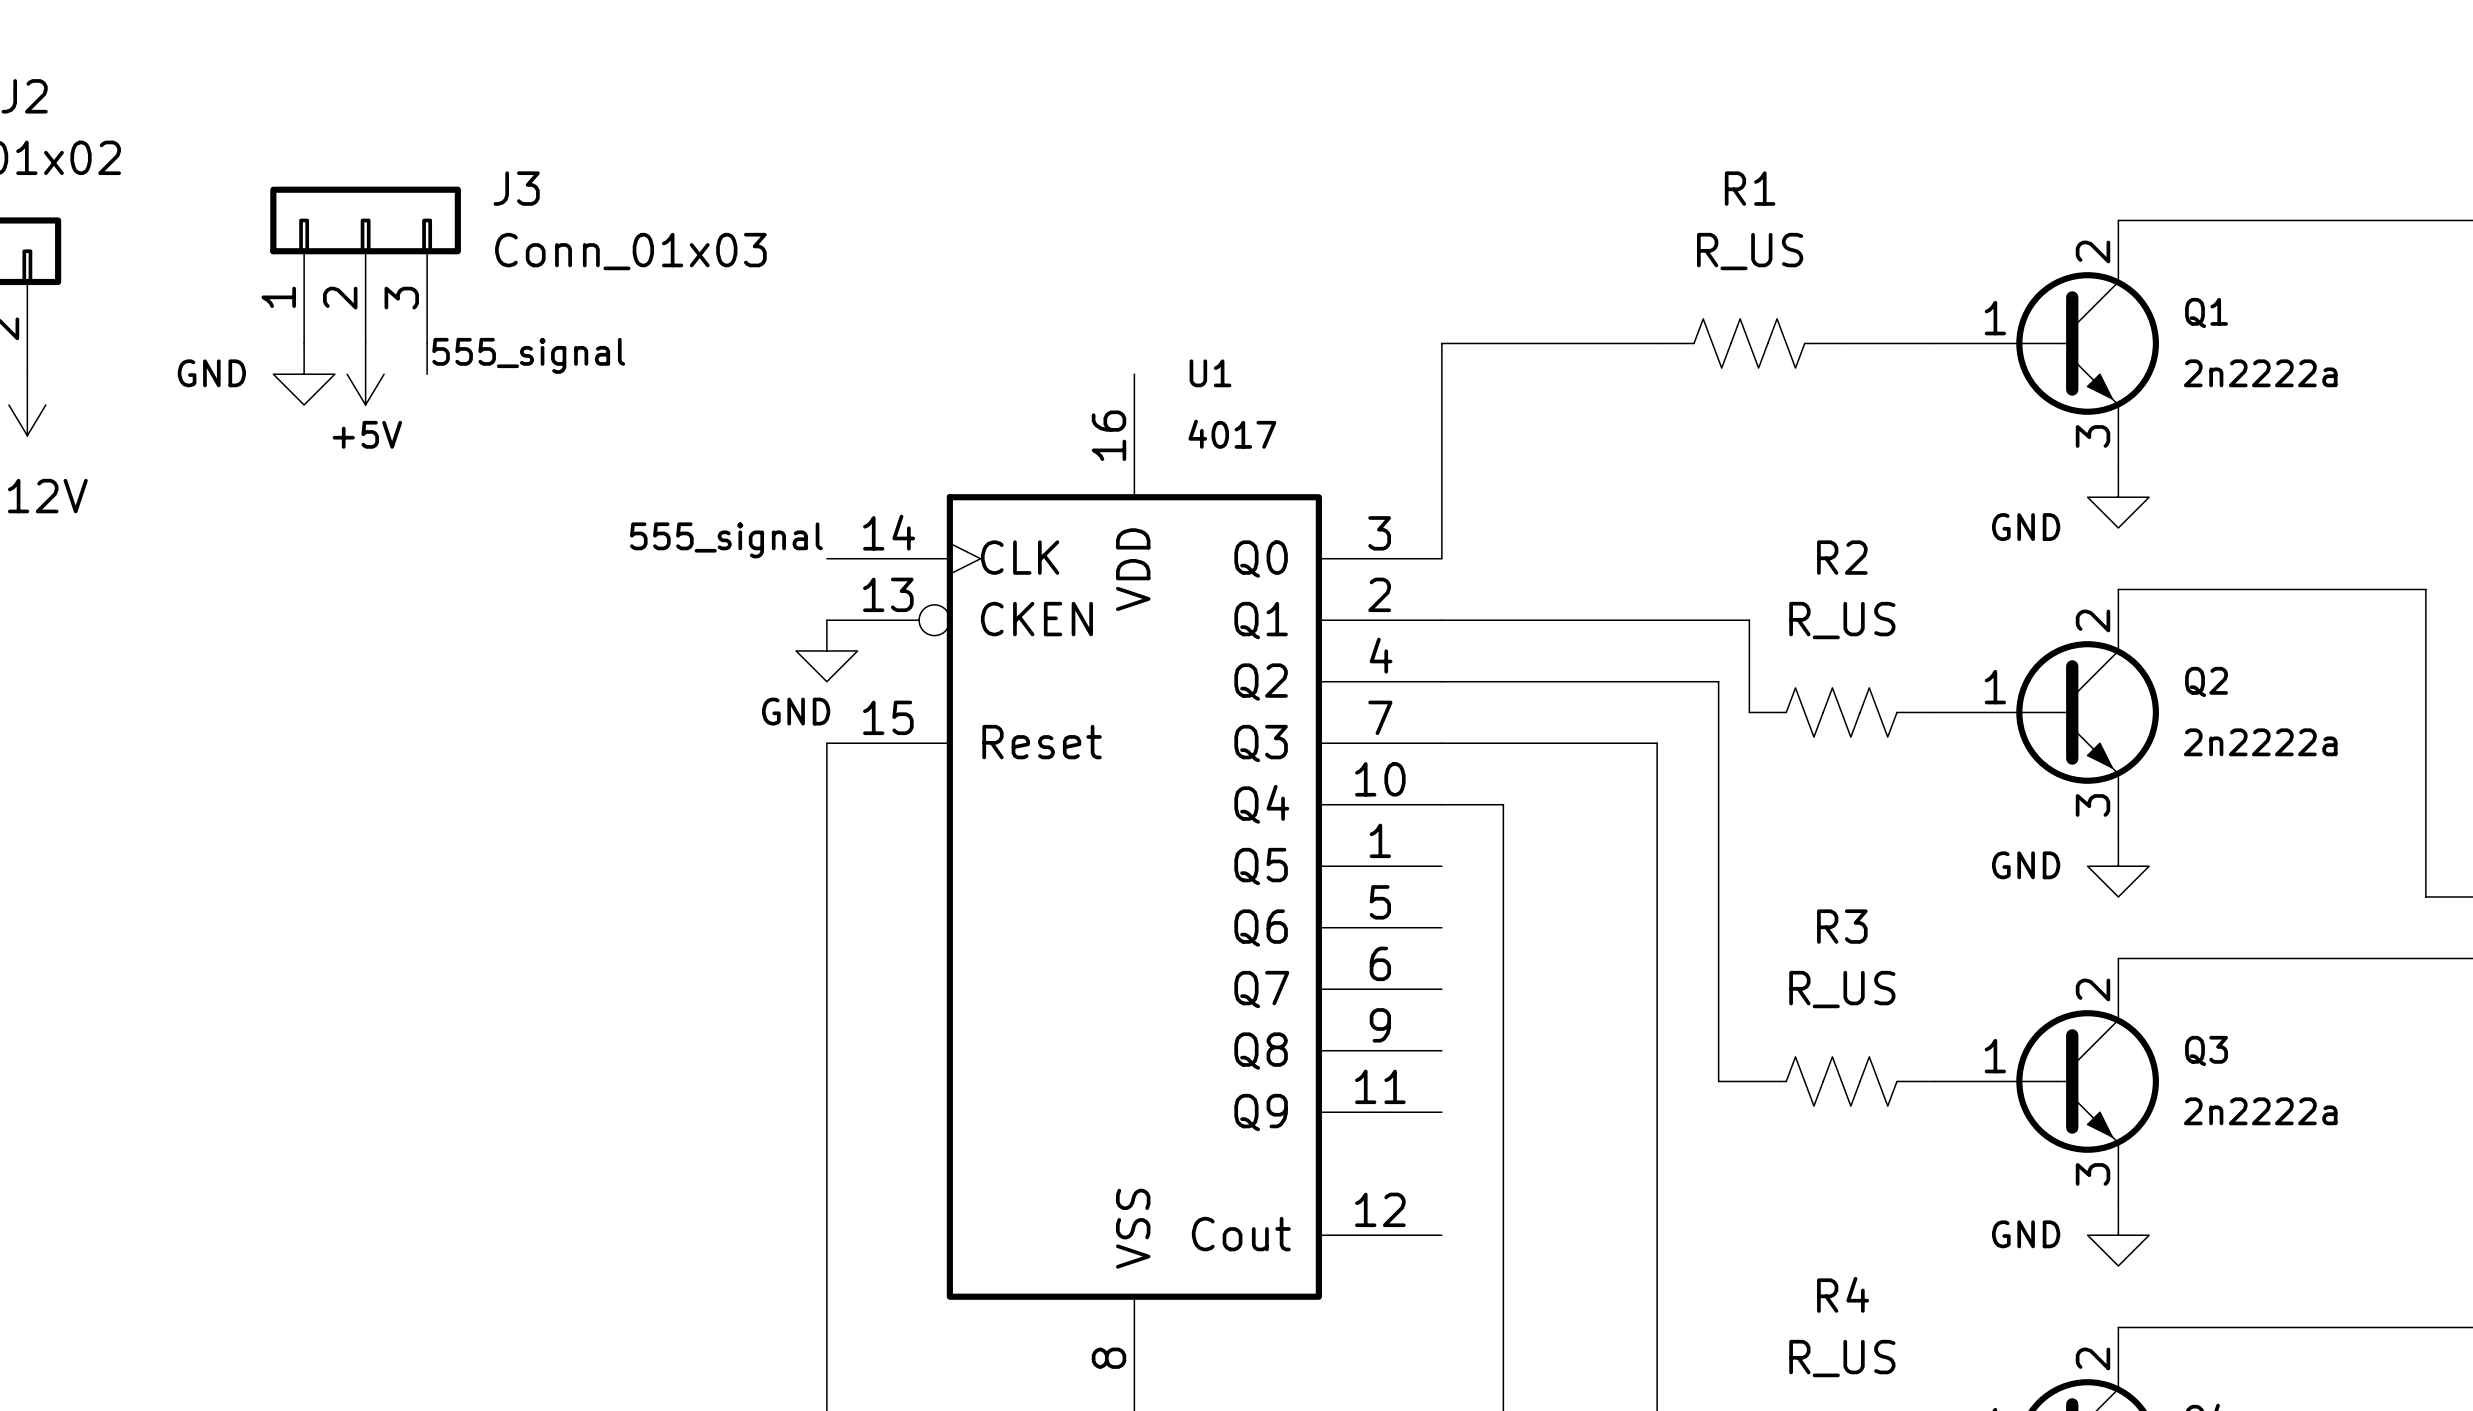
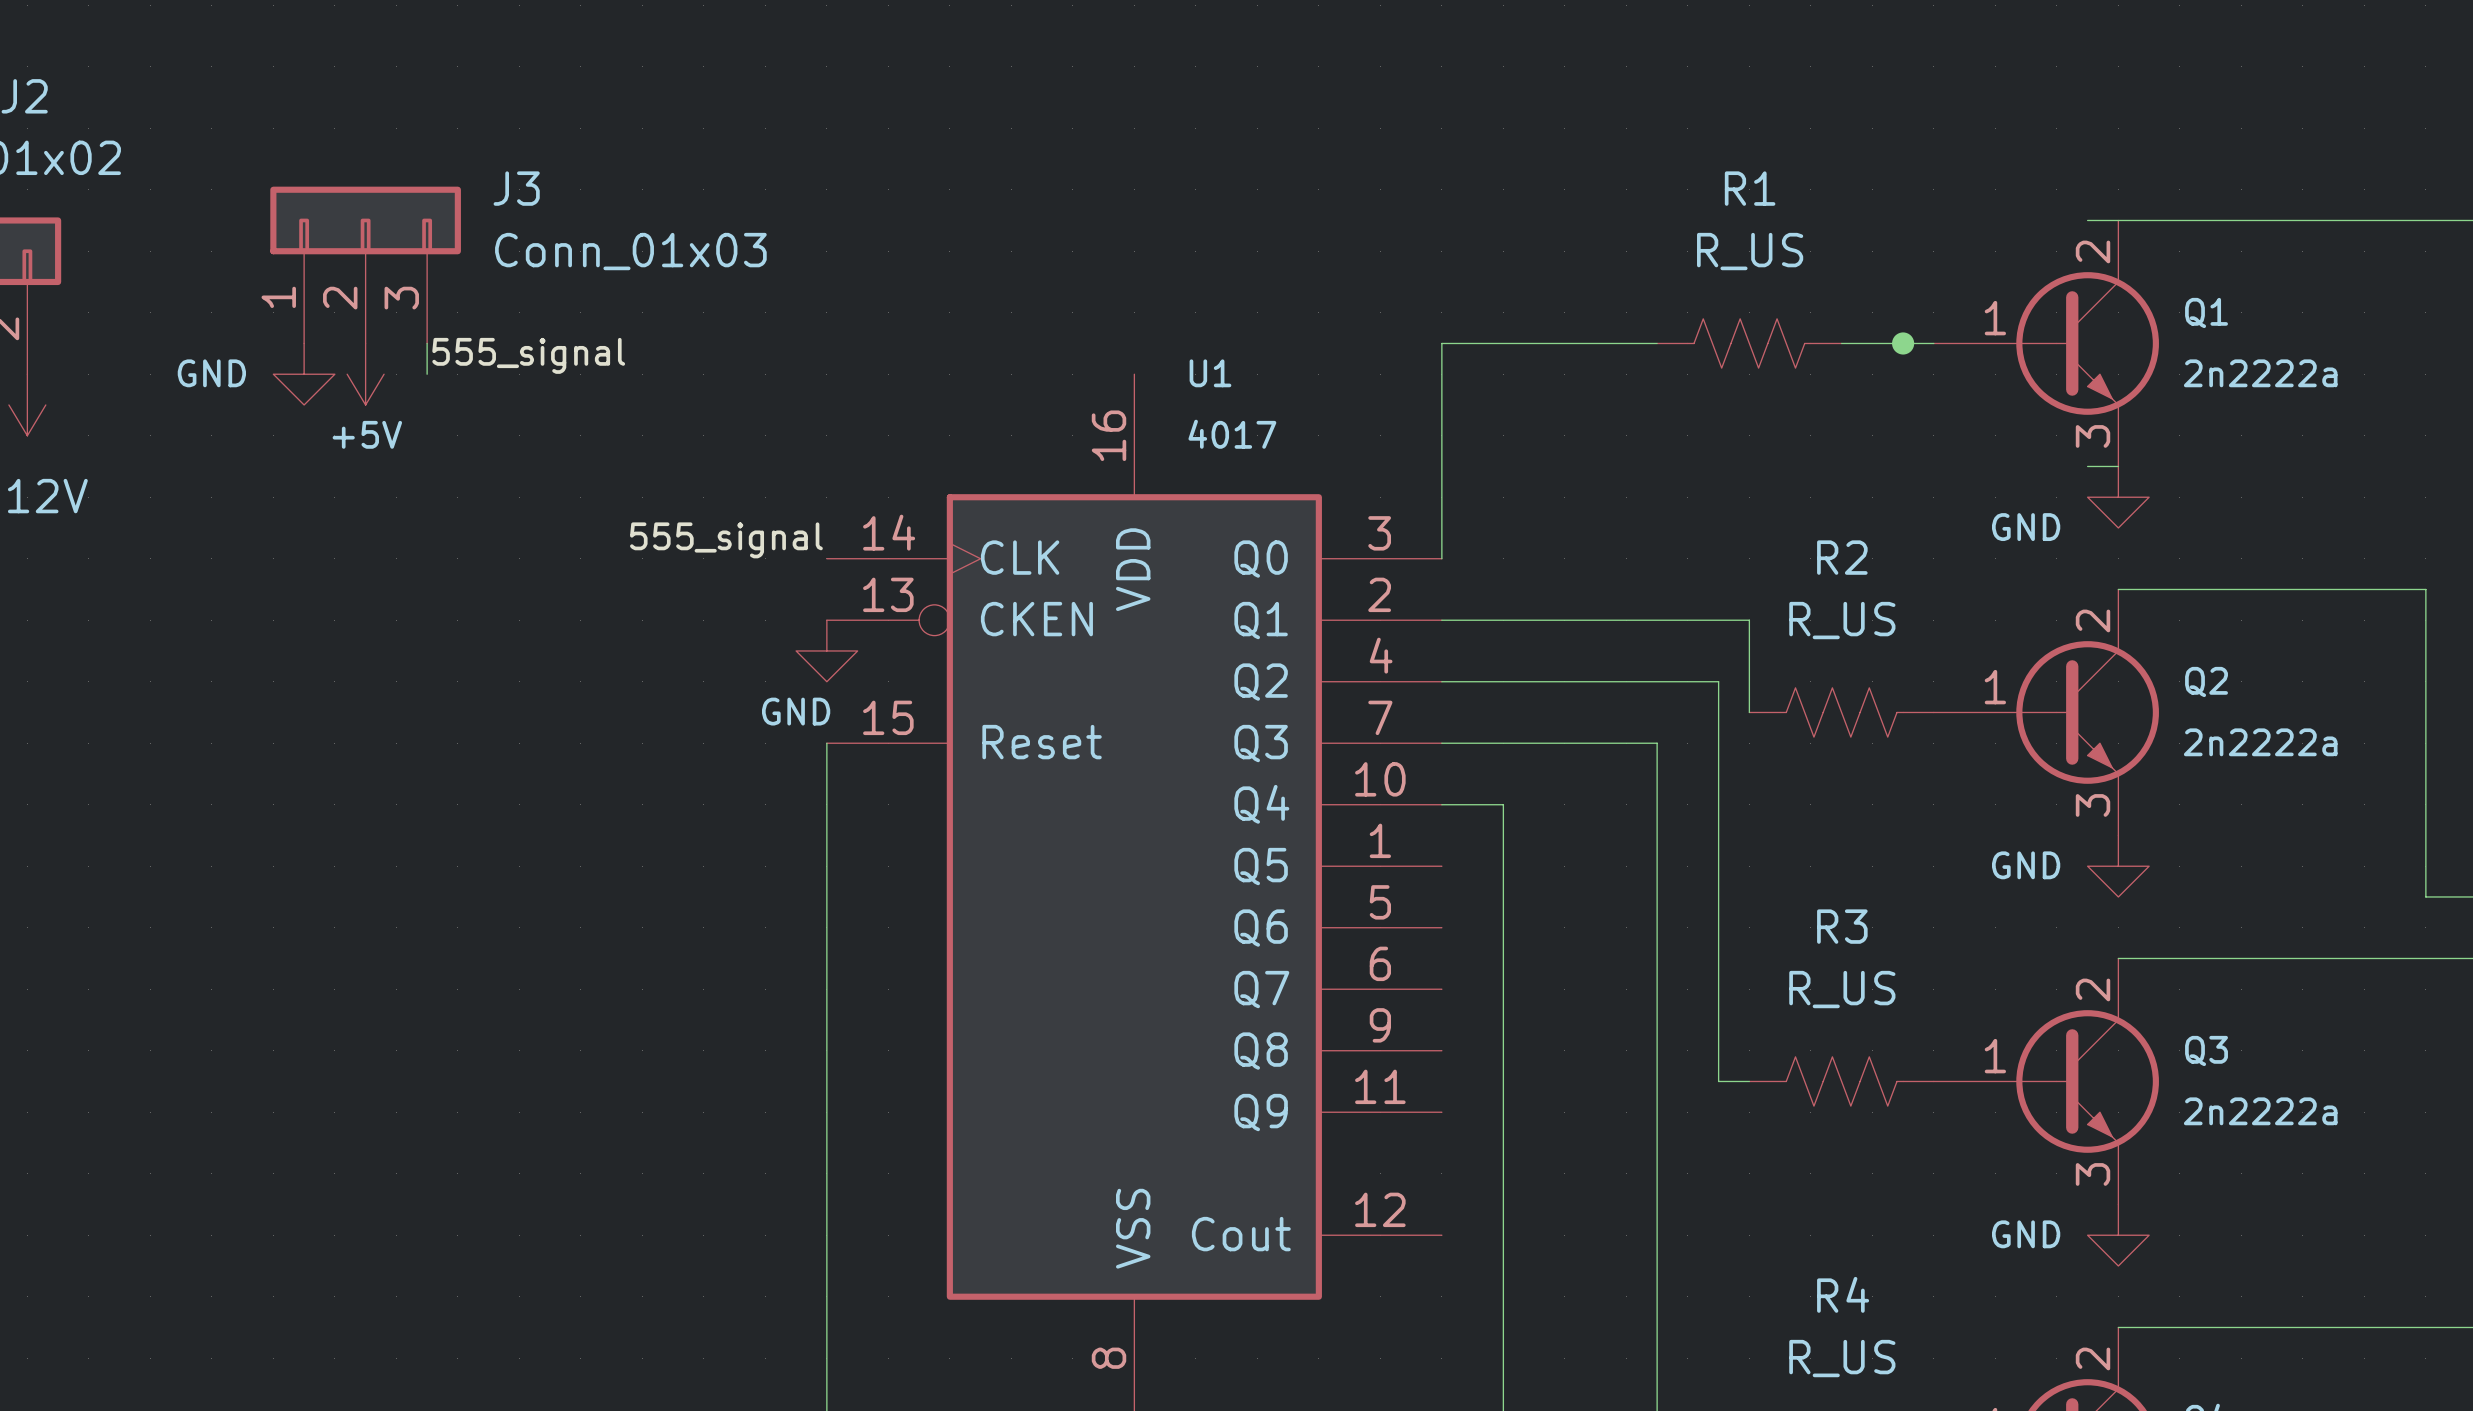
wire: none -> (2087, 220) (2118, 220)
junction: none -> (1903, 343)
wire: none -> (2087, 466) (2118, 466)

